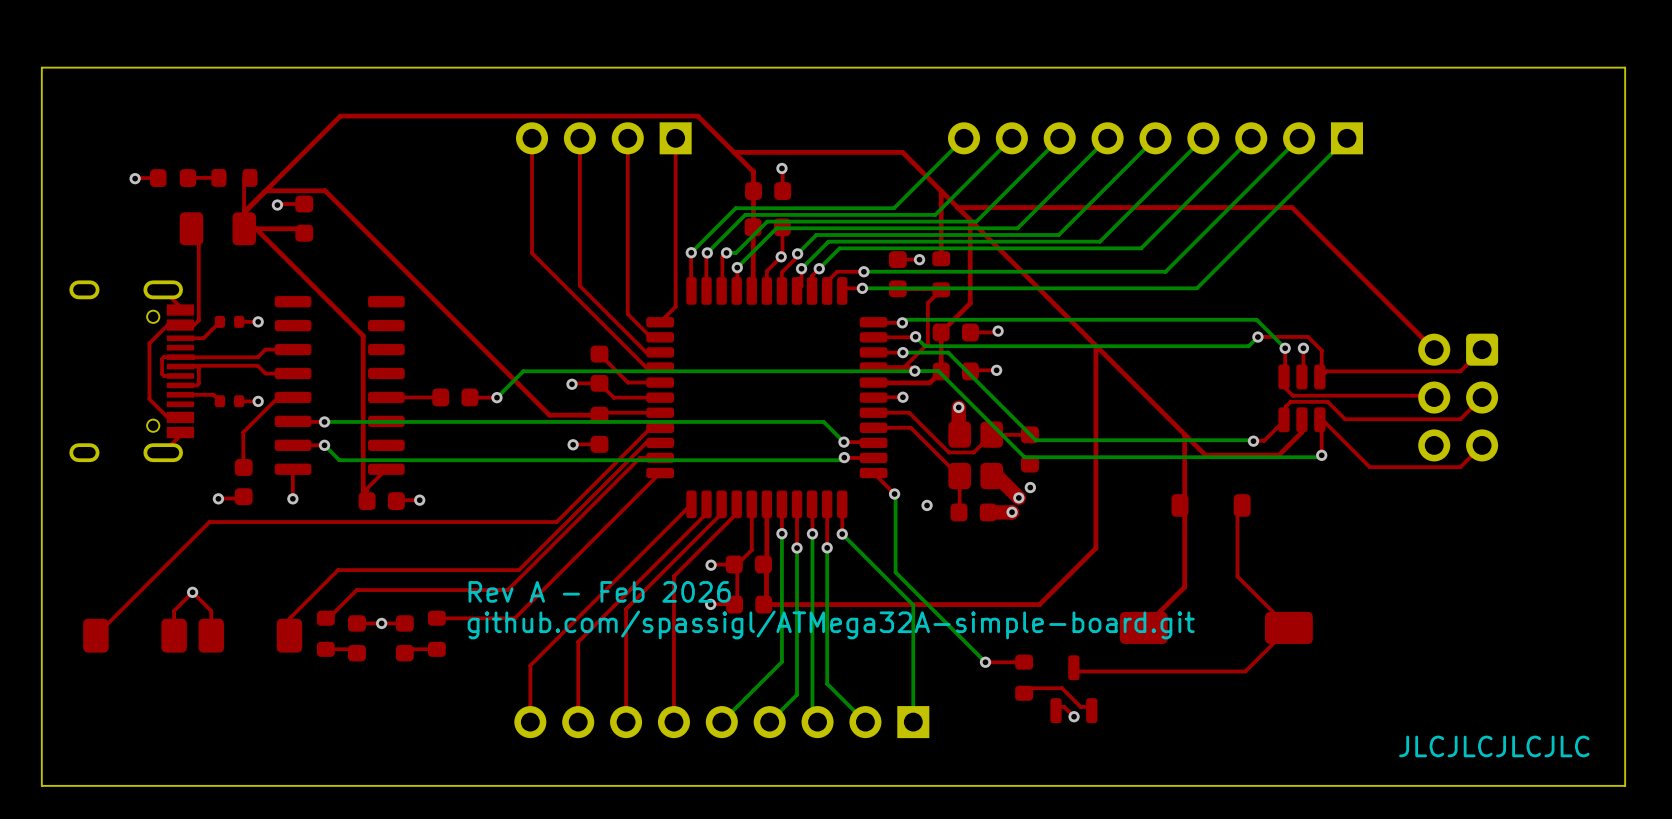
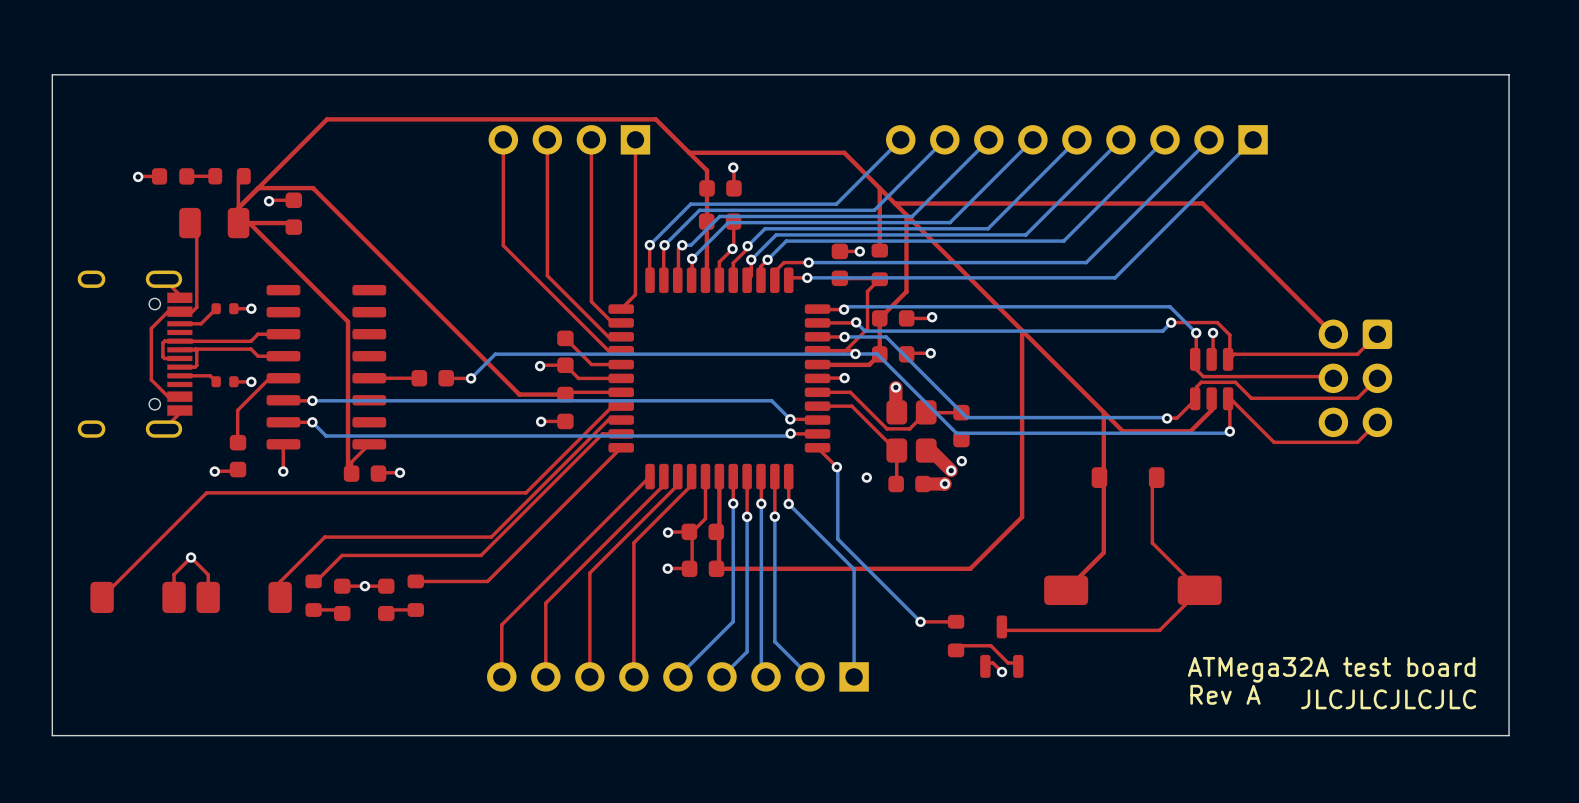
text: Rev A - Feb 2026 (599, 591) -> none
text: github.com/spassigl/ATMega32A-simple-board.git (831, 624) -> none
text: none -> ATMega32A test board (1331, 669)
text: none -> Rev A (1225, 694)

